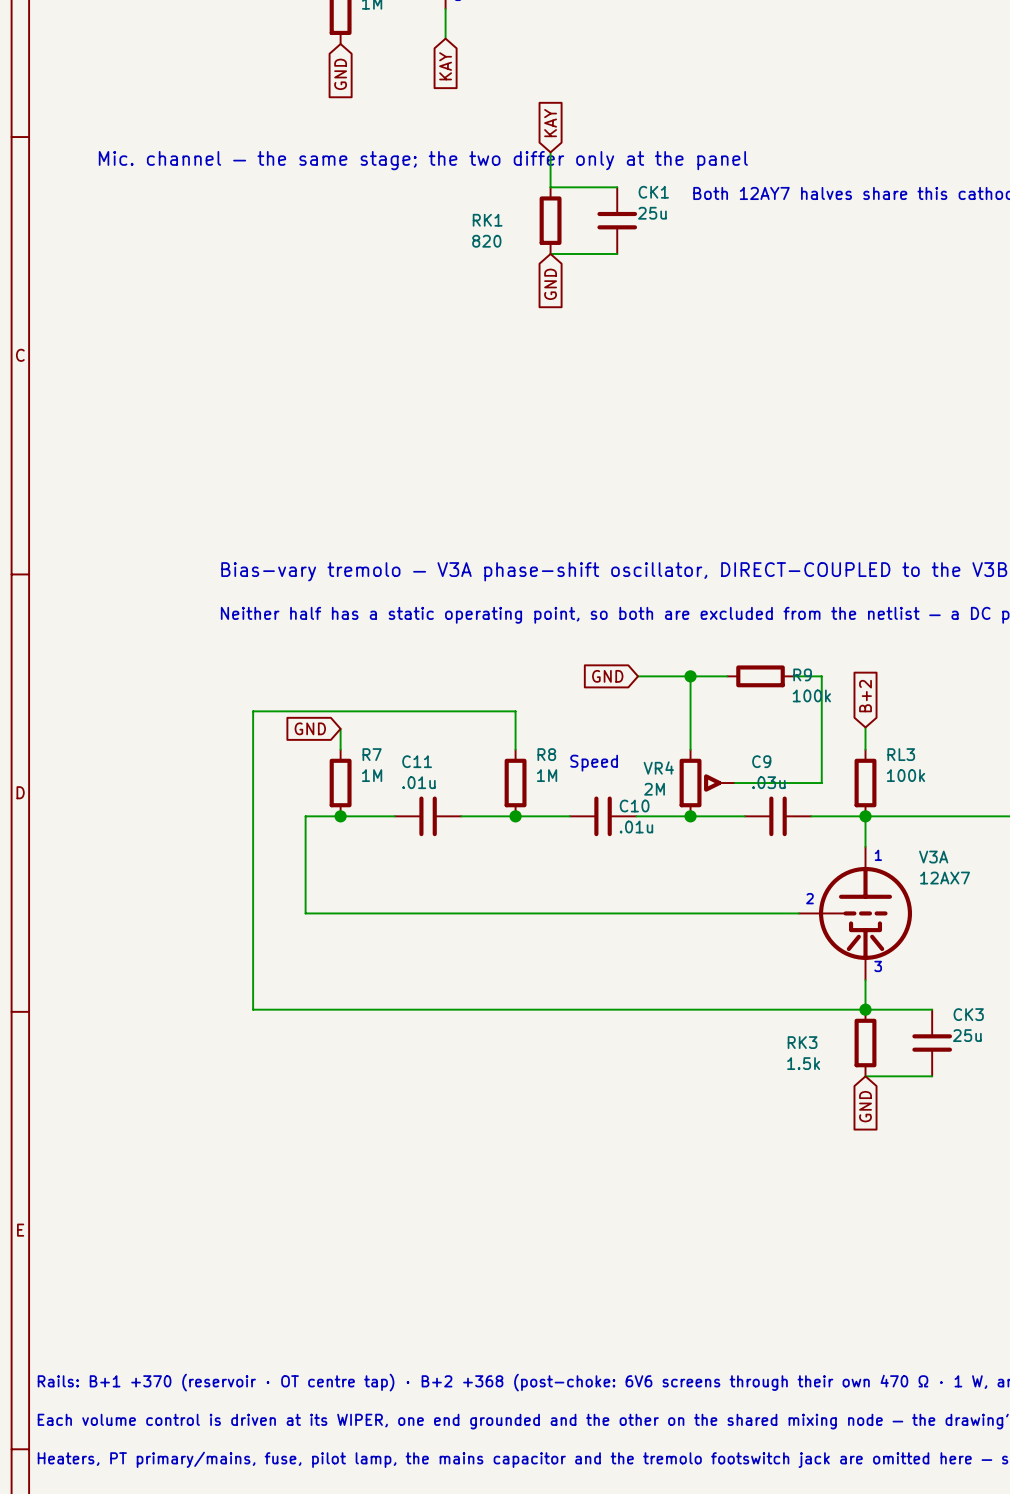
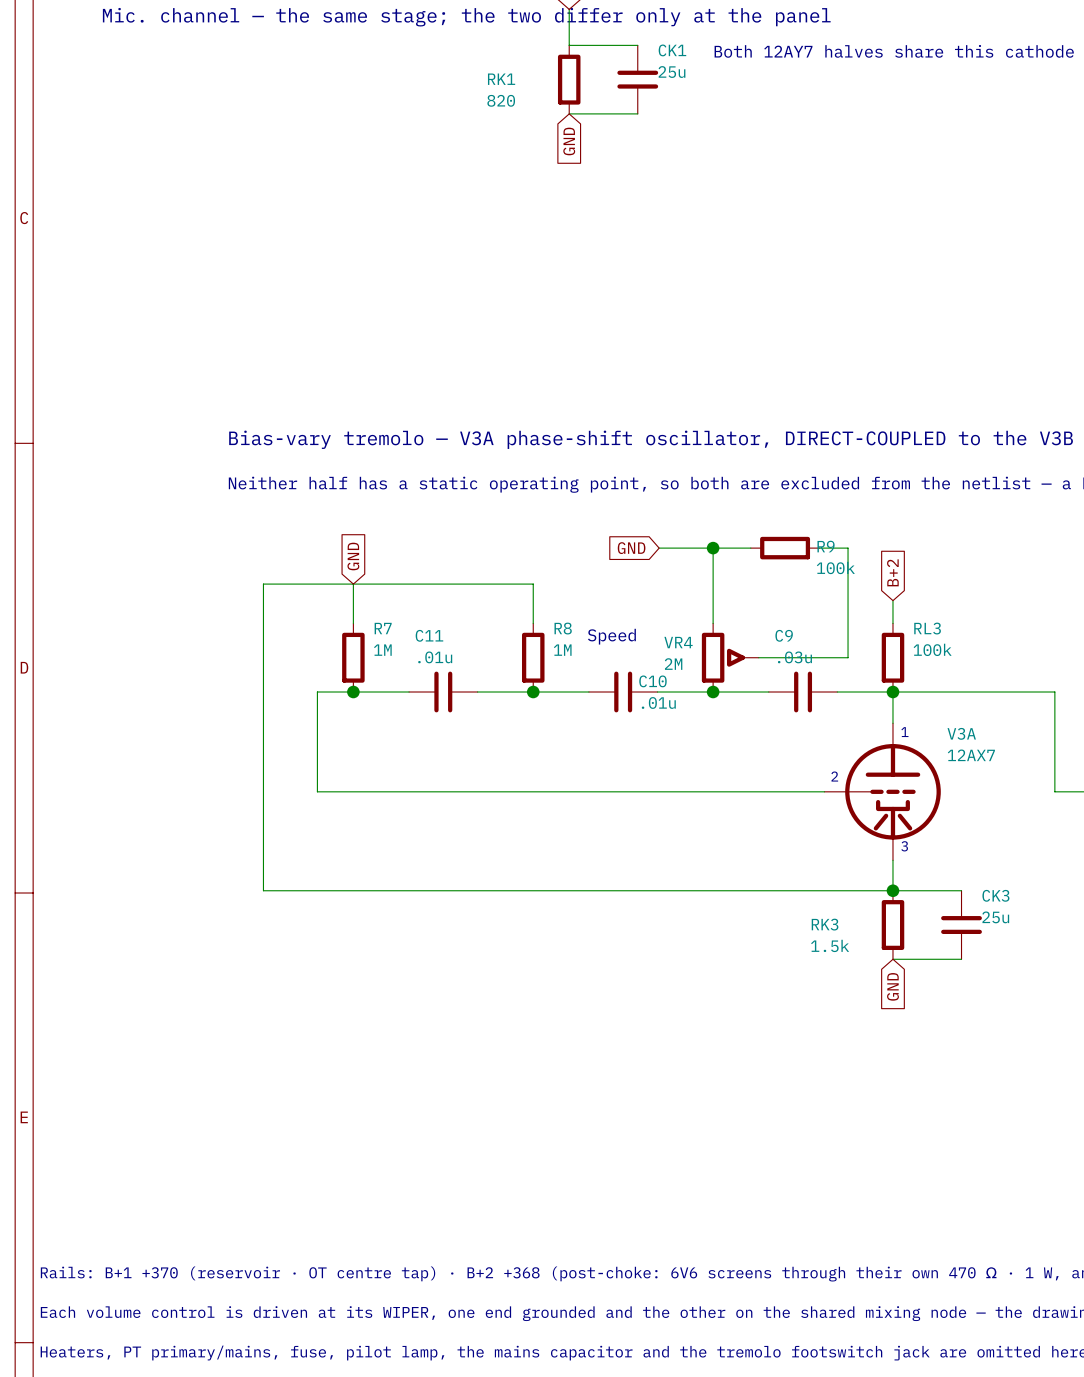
wire: none -> (353, 584) (353, 602)
global label rotation: 0° (310, 728) -> 90° clockwise (353, 556)

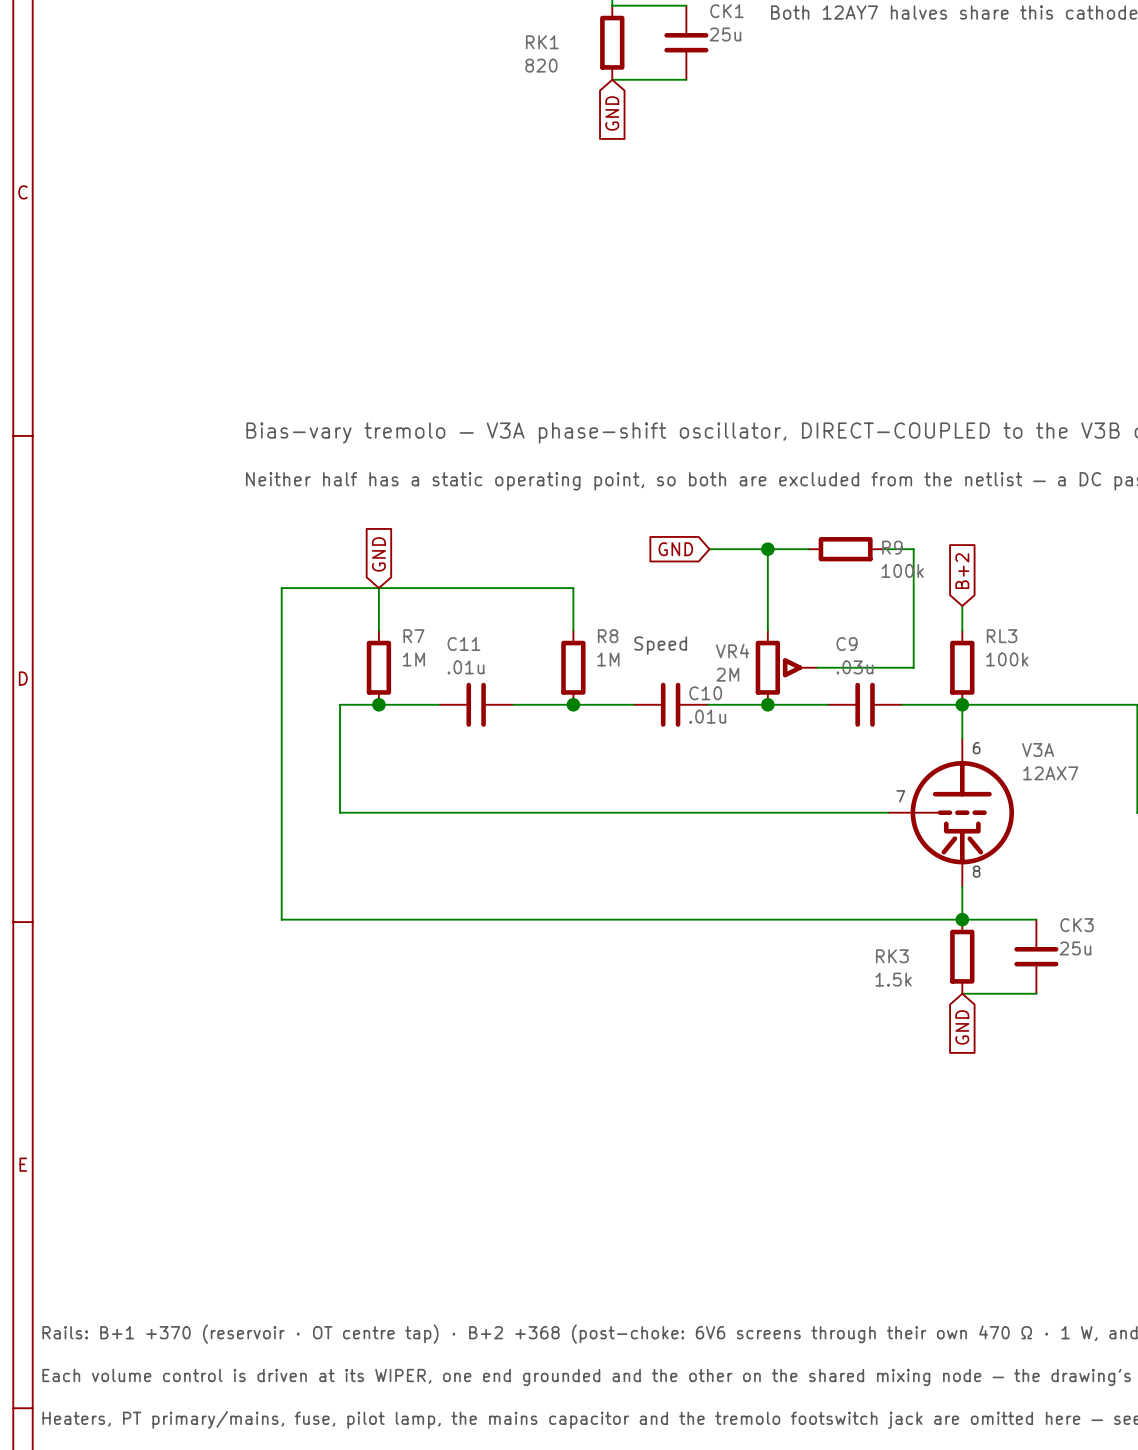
text: 1 (904, 732) -> 6 (976, 748)
text: 2 (834, 776) -> 7 (900, 796)
text: 3 (904, 846) -> 8 (976, 871)

